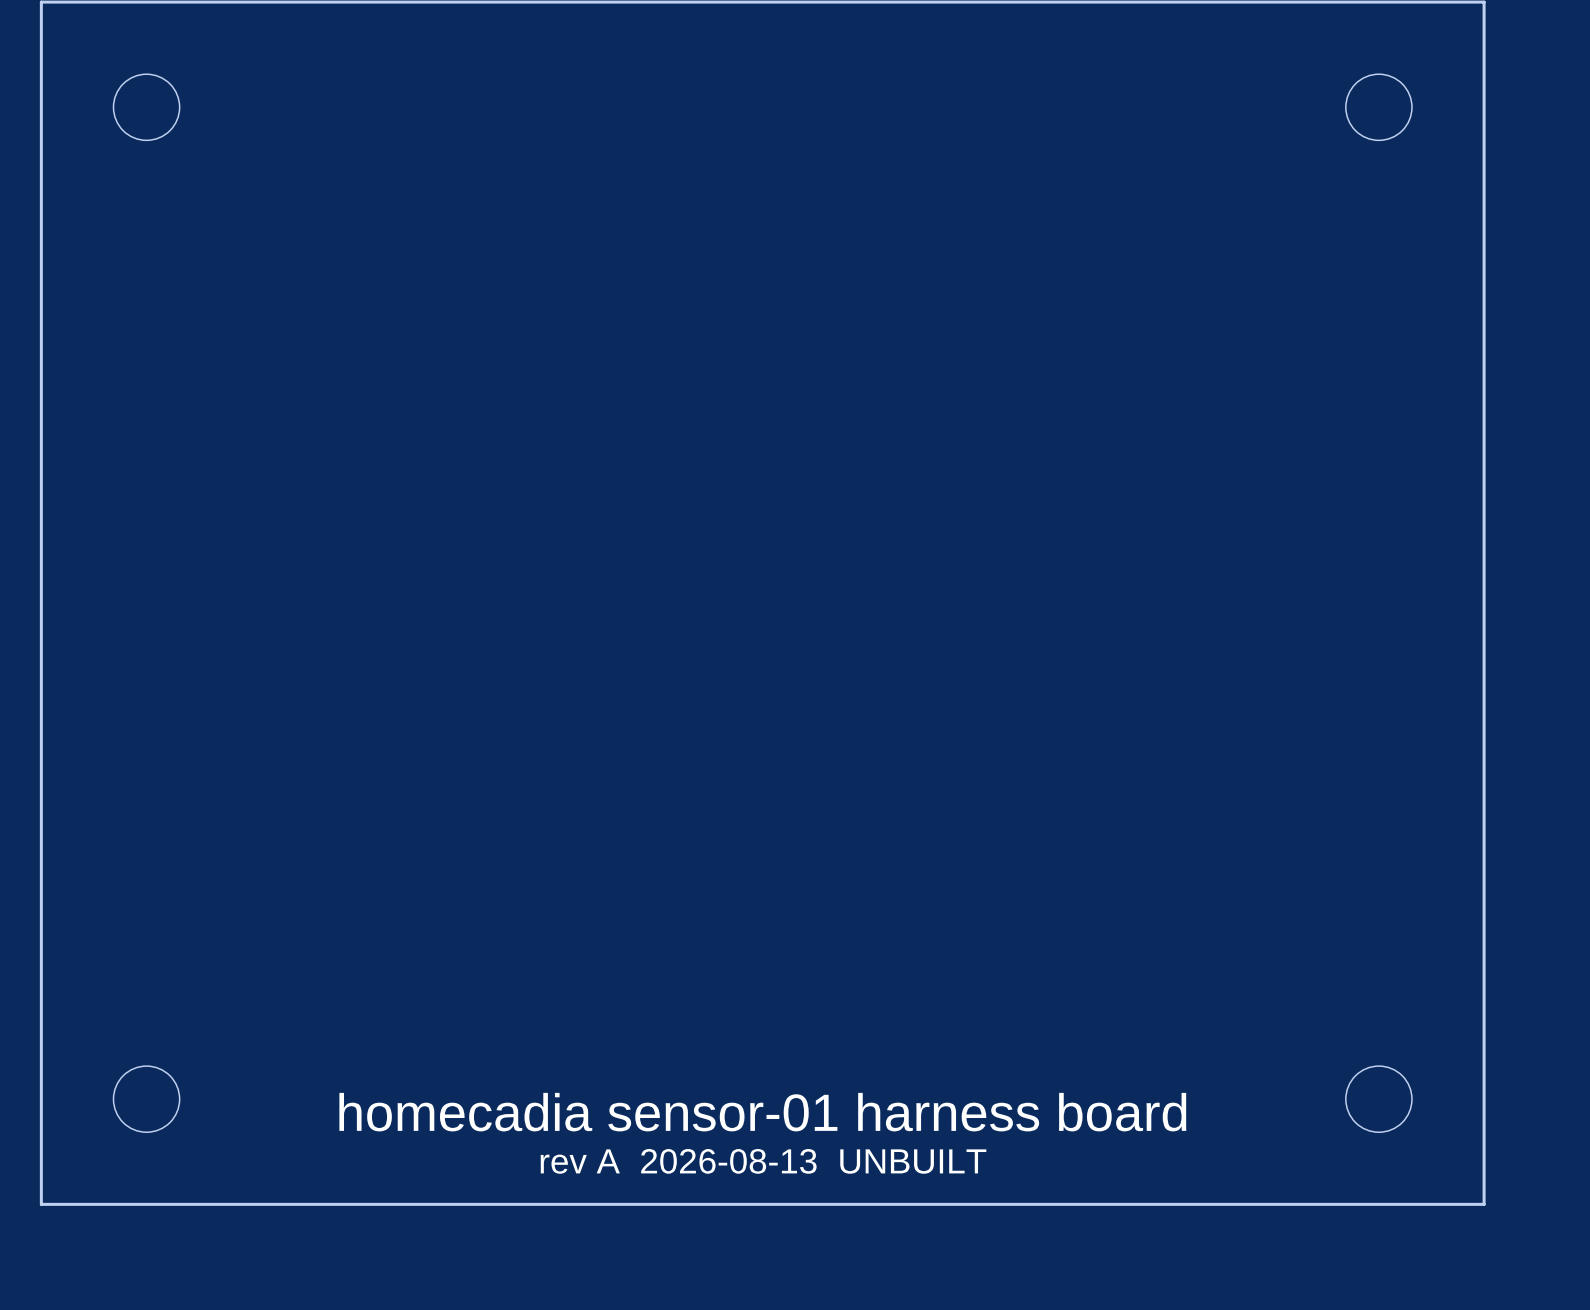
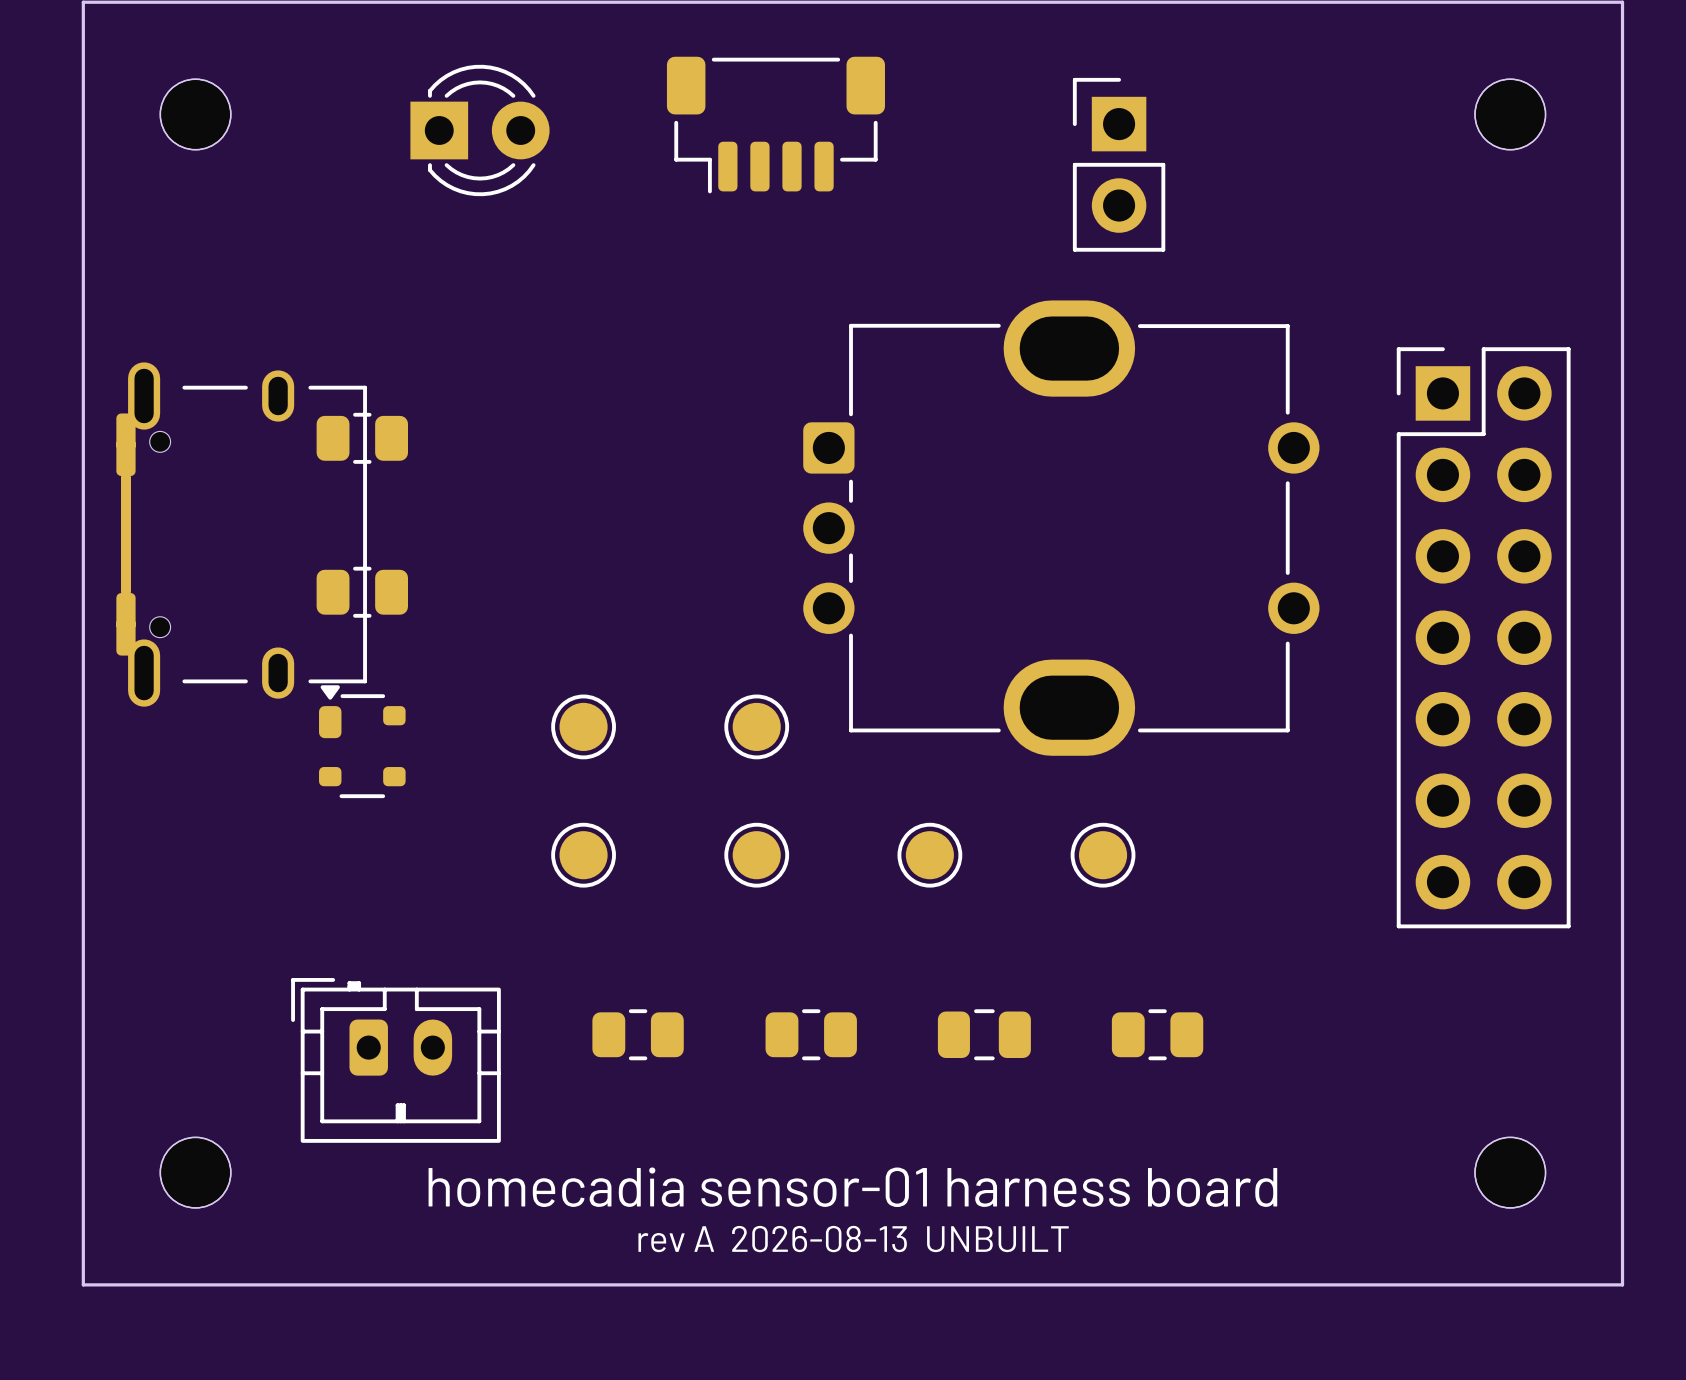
part: none -> (195, 114)
part: none -> (1510, 114)
part: none -> (775, 125)
part: none -> (479, 130)
part: none -> (1119, 164)
part: none -> (362, 438)
part: none -> (1061, 528)
part: none -> (241, 534)
part: none -> (362, 592)
part: none -> (1483, 637)
part: none -> (583, 726)
part: none -> (756, 726)
part: none -> (362, 741)
part: none -> (583, 855)
part: none -> (756, 855)
part: none -> (929, 855)
part: none -> (1103, 855)
part: none -> (638, 1034)
part: none -> (811, 1034)
part: none -> (984, 1034)
part: none -> (1157, 1034)
part: none -> (395, 1060)
part: none -> (195, 1172)
part: none -> (1510, 1172)

